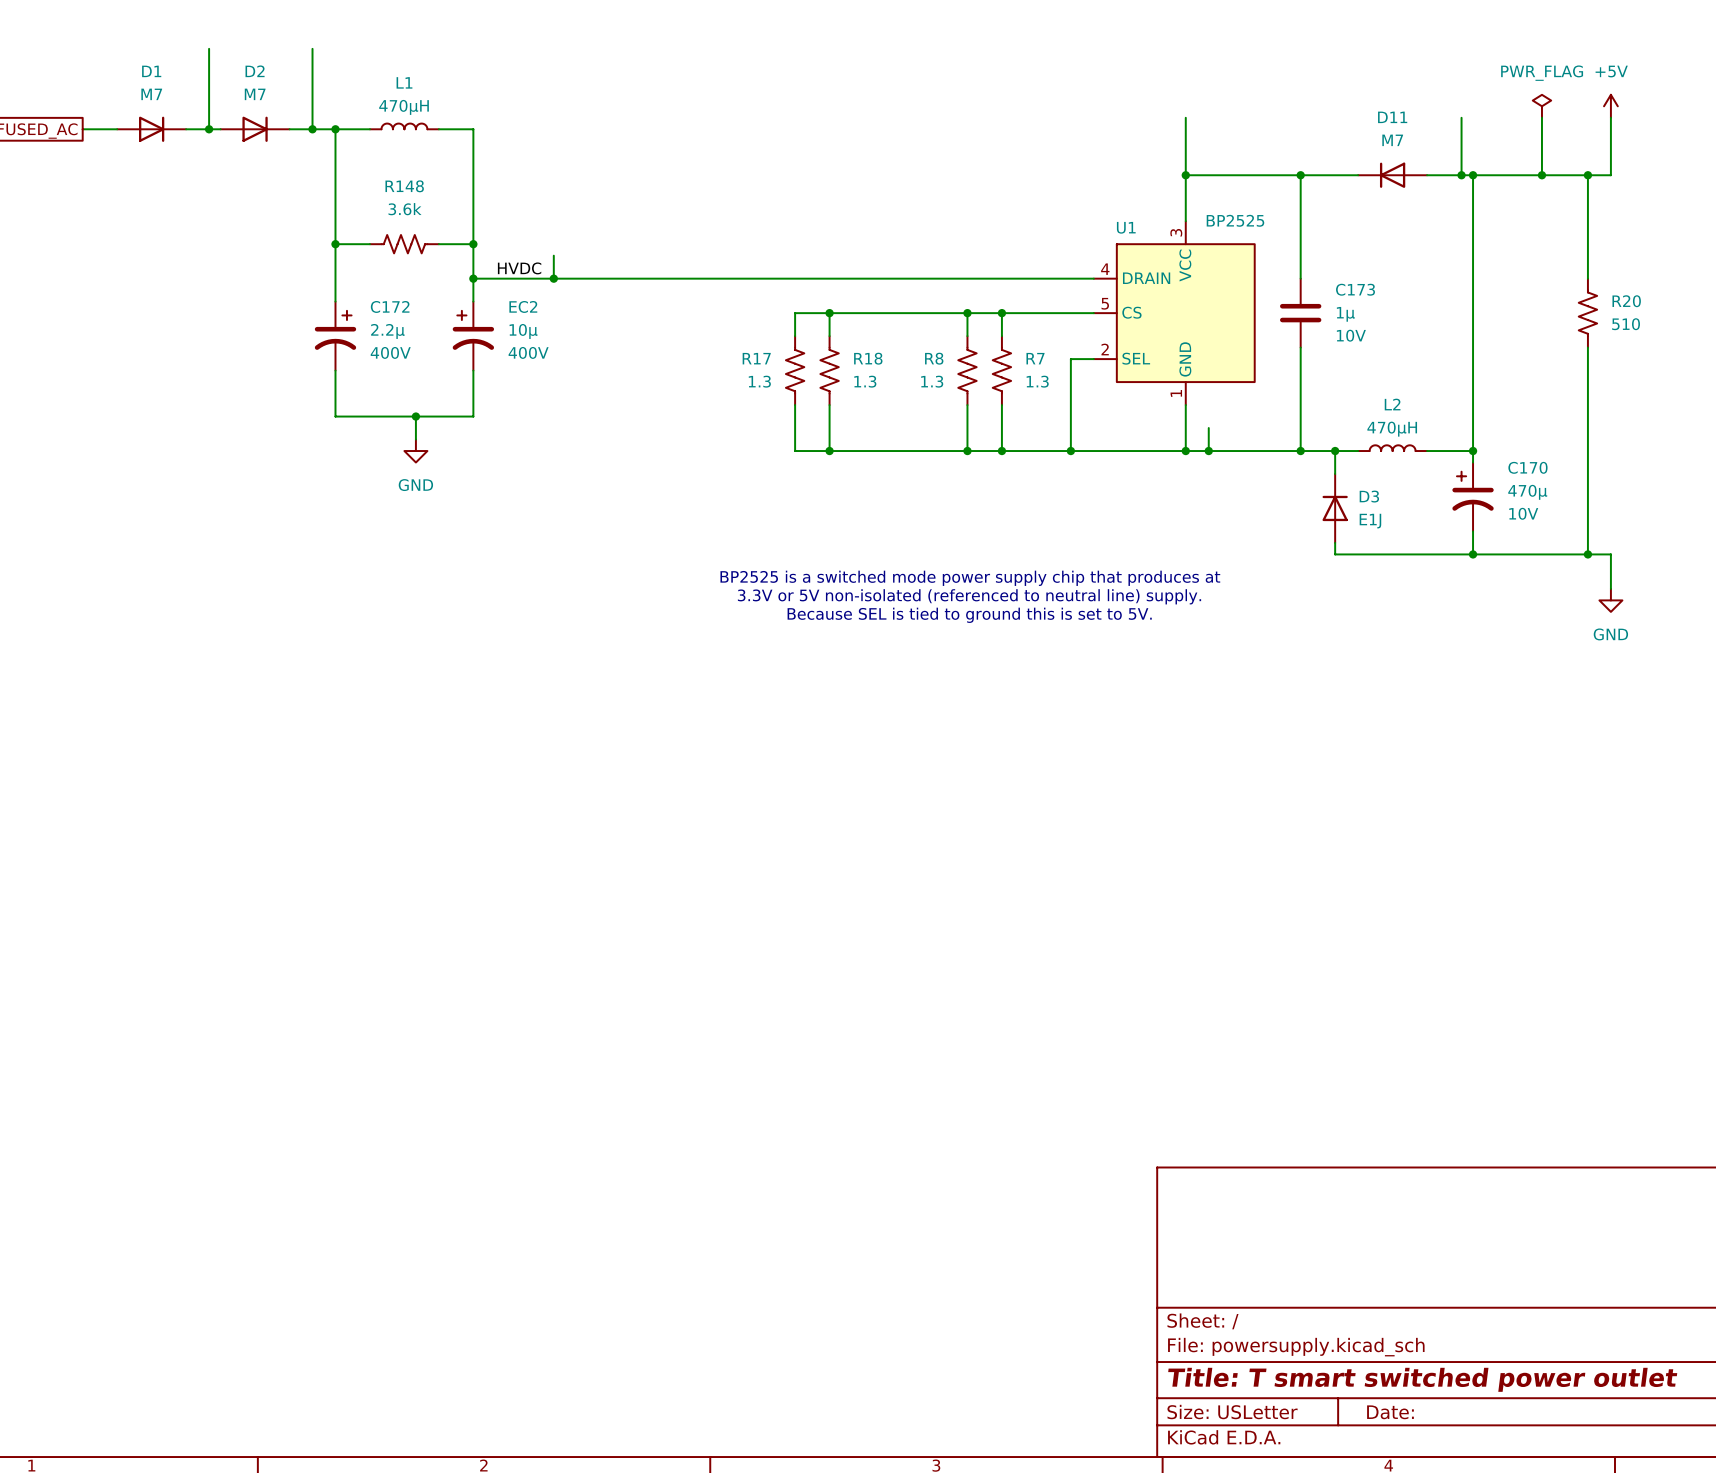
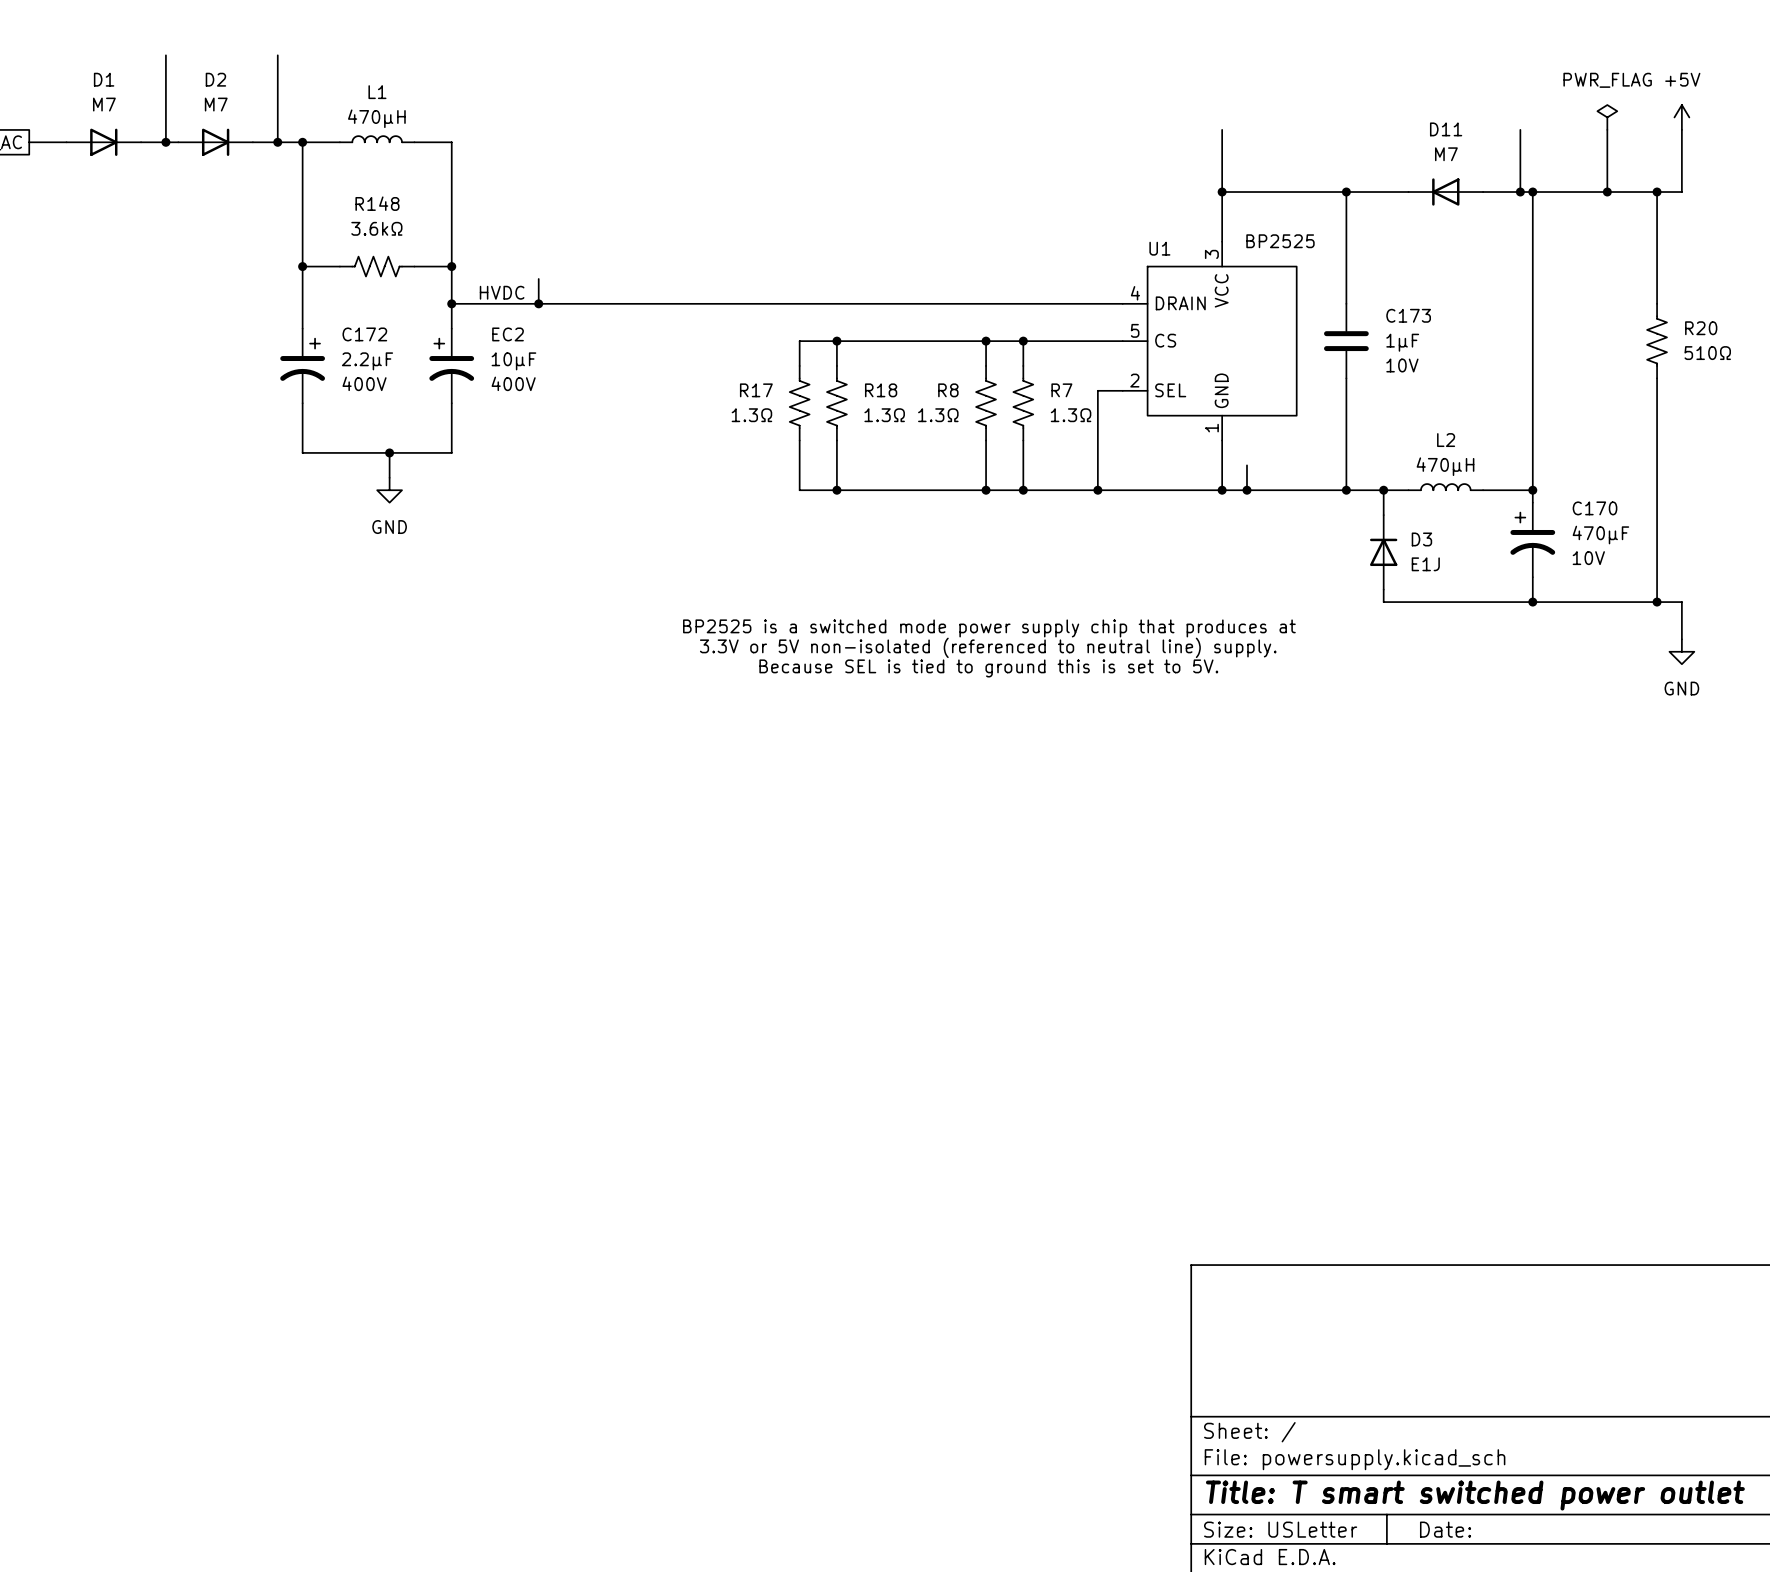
R148 value: 3.6k (405, 209) -> 3.6kΩ (376, 228)
C173 value: 1µ (1345, 314) -> 1µF (1402, 342)
R20 value: 510 (1626, 324) -> 510Ω (1707, 353)
C172 value: 2.2µ (387, 331) -> 2.2µF (367, 361)
EC2 value: 10µ (523, 331) -> 10µF (513, 361)
R17 value: 1.3 (759, 381) -> 1.3Ω (751, 415)
R18 value: 1.3 (865, 381) -> 1.3Ω (884, 415)
R8 value: 1.3 (932, 381) -> 1.3Ω (938, 415)
R7 value: 1.3 (1037, 381) -> 1.3Ω (1071, 415)
C170 value: 470µ (1527, 492) -> 470µF (1600, 535)

